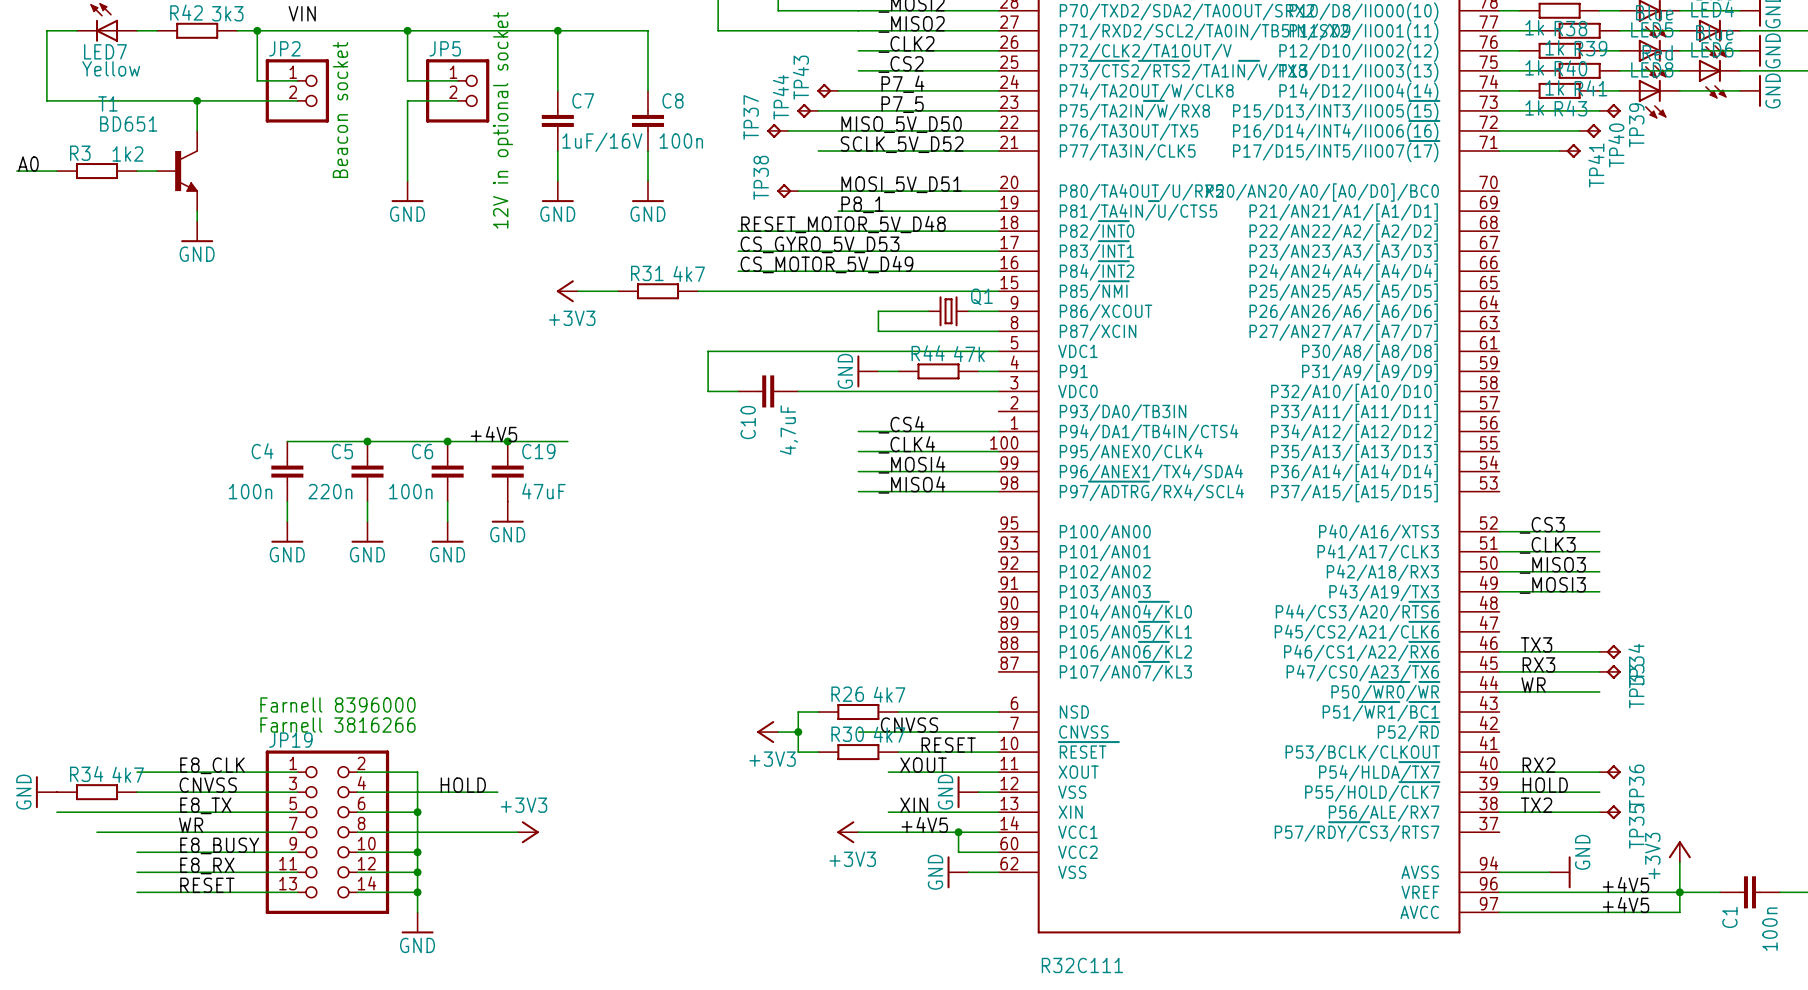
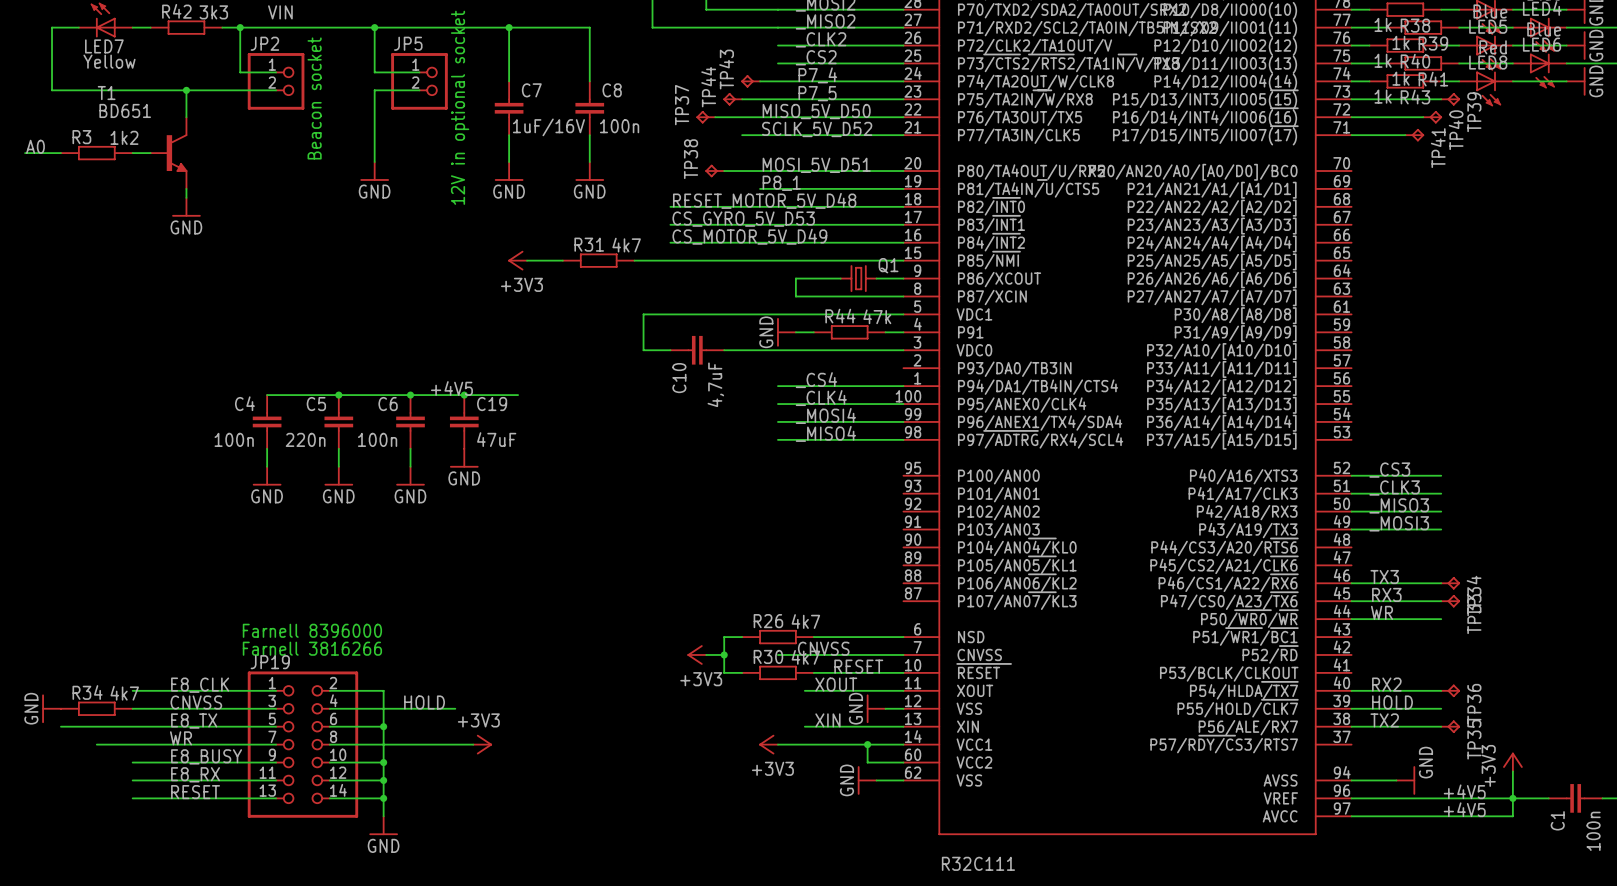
label: +4V5 (924, 824) -> none

